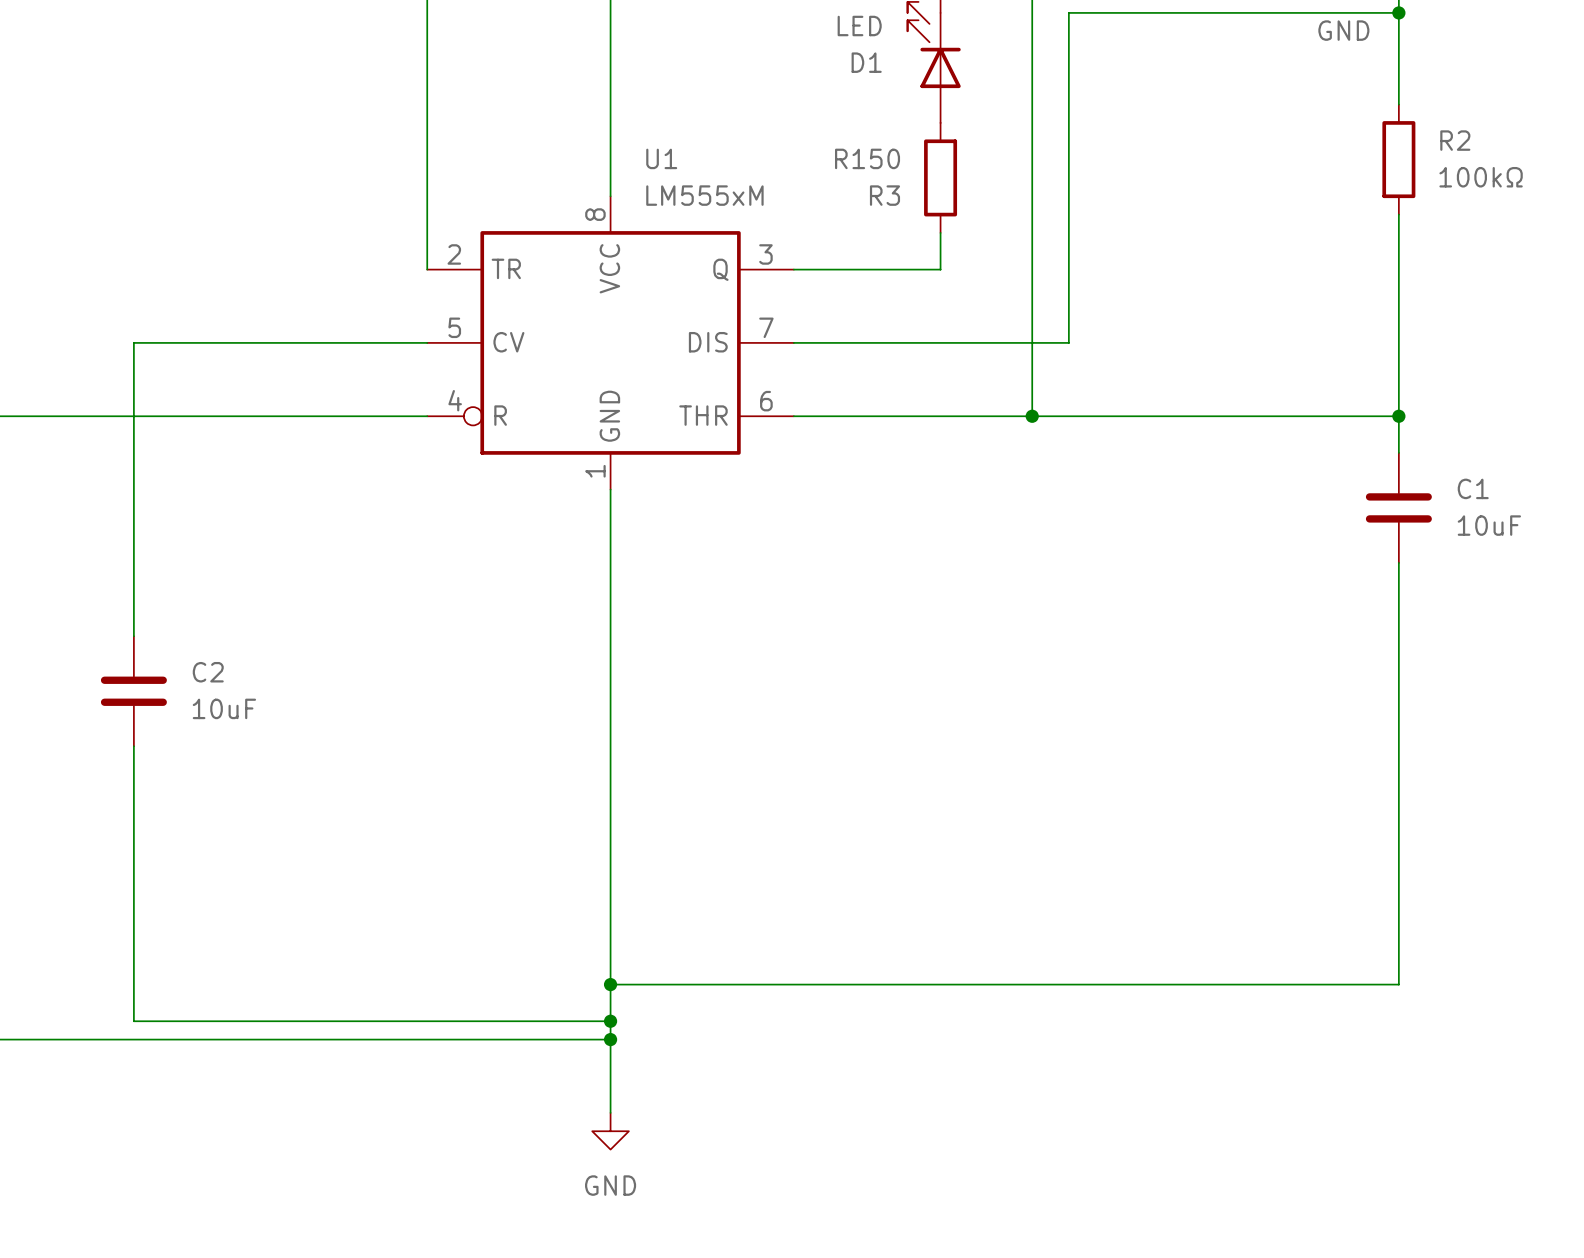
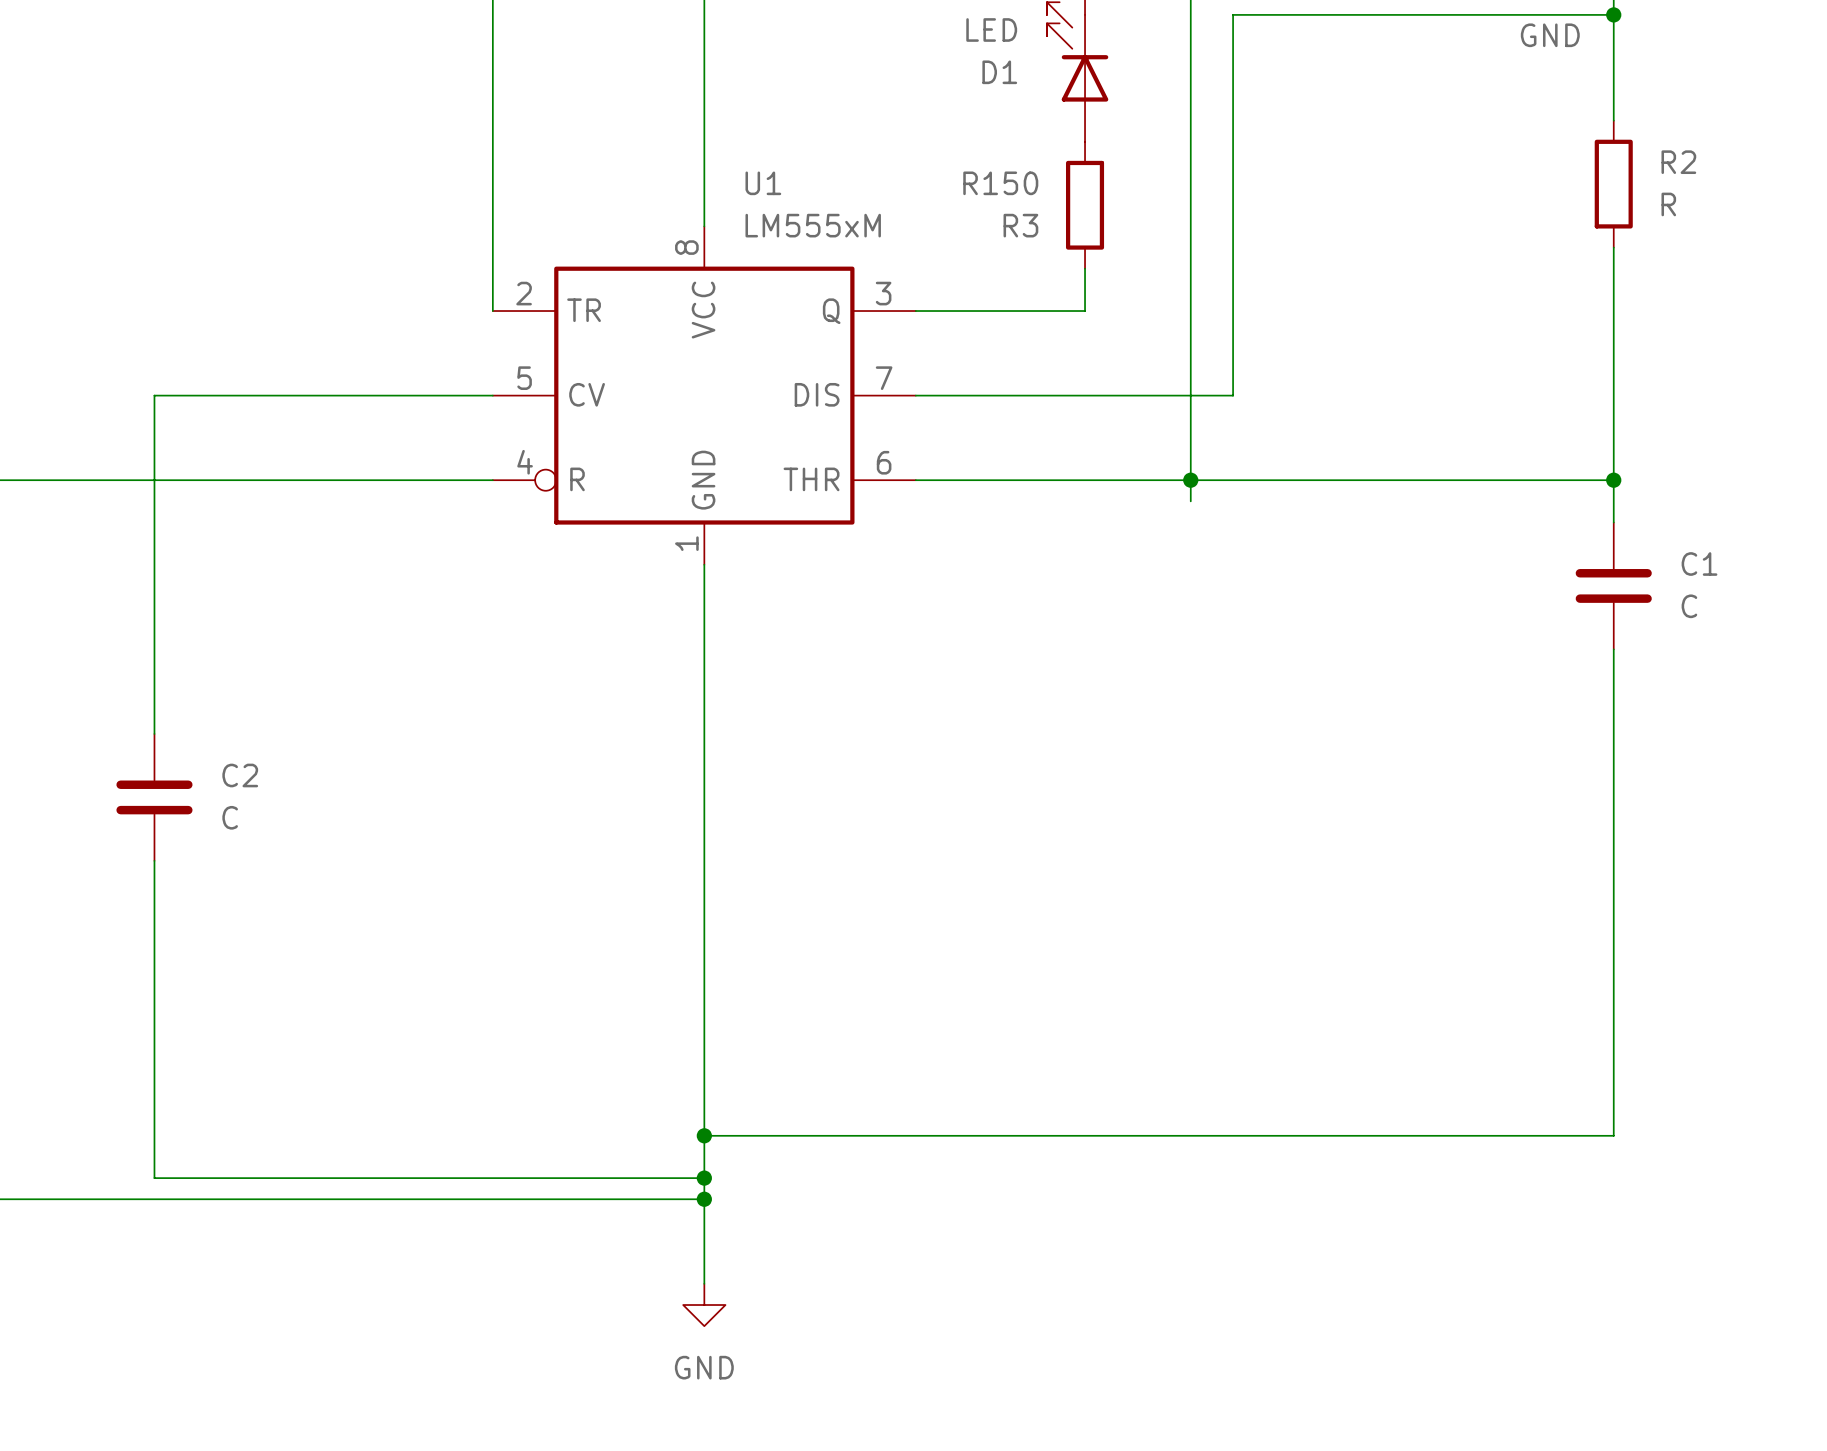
R2 value: 100kΩ (1481, 177) -> R (1668, 204)
wire: none -> (1190, 480) (1190, 501)
C1 value: 10uF (1489, 525) -> C (1689, 606)
C2 value: 10uF (224, 708) -> C (230, 817)

